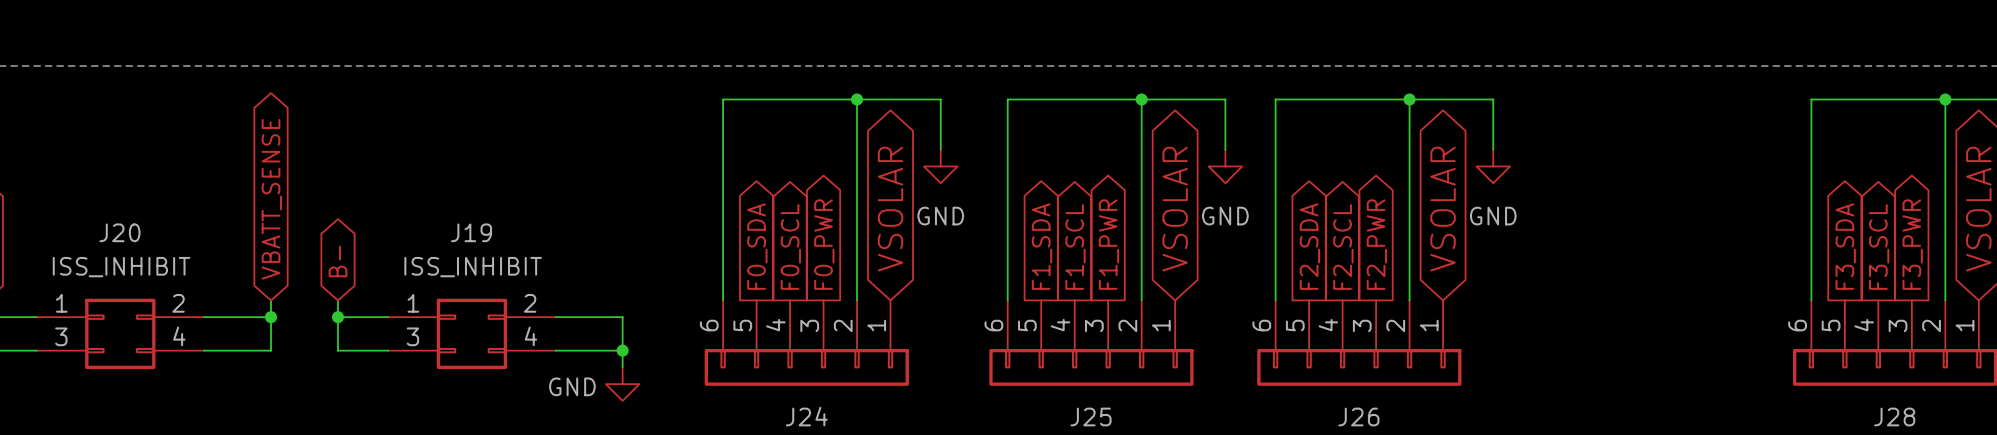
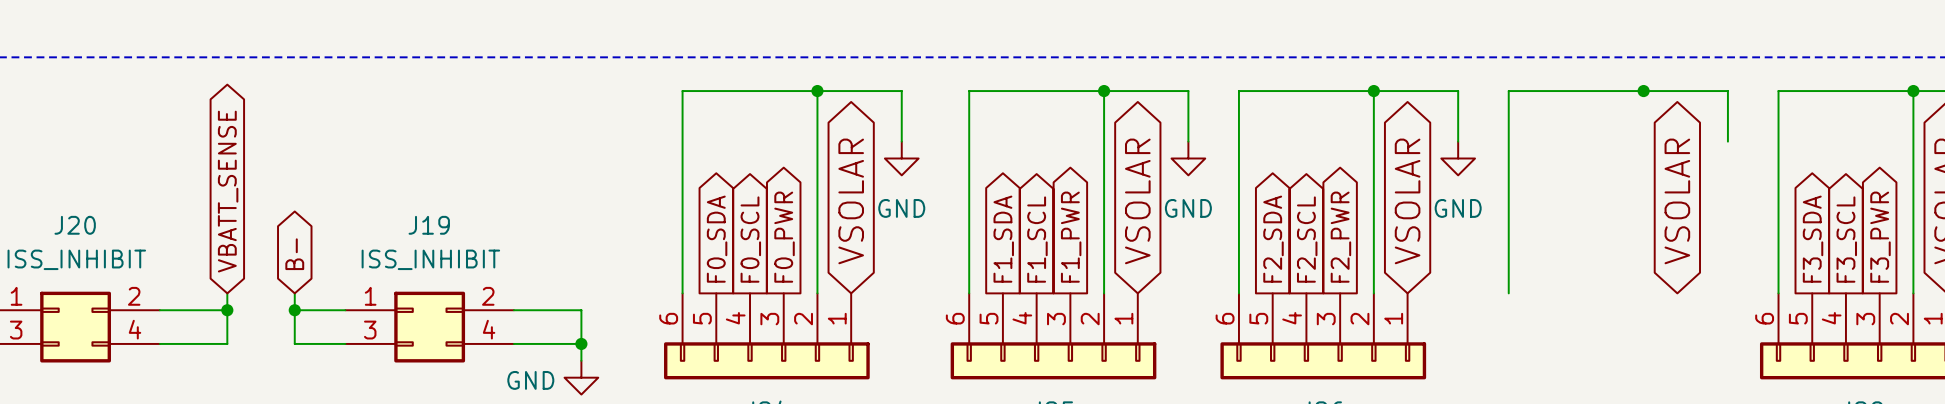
junction: none -> (1643, 91)
wire: none -> (1727, 141) (1727, 91) (1508, 91) (1508, 293)
global label: none -> VSOLAR (1677, 201)

